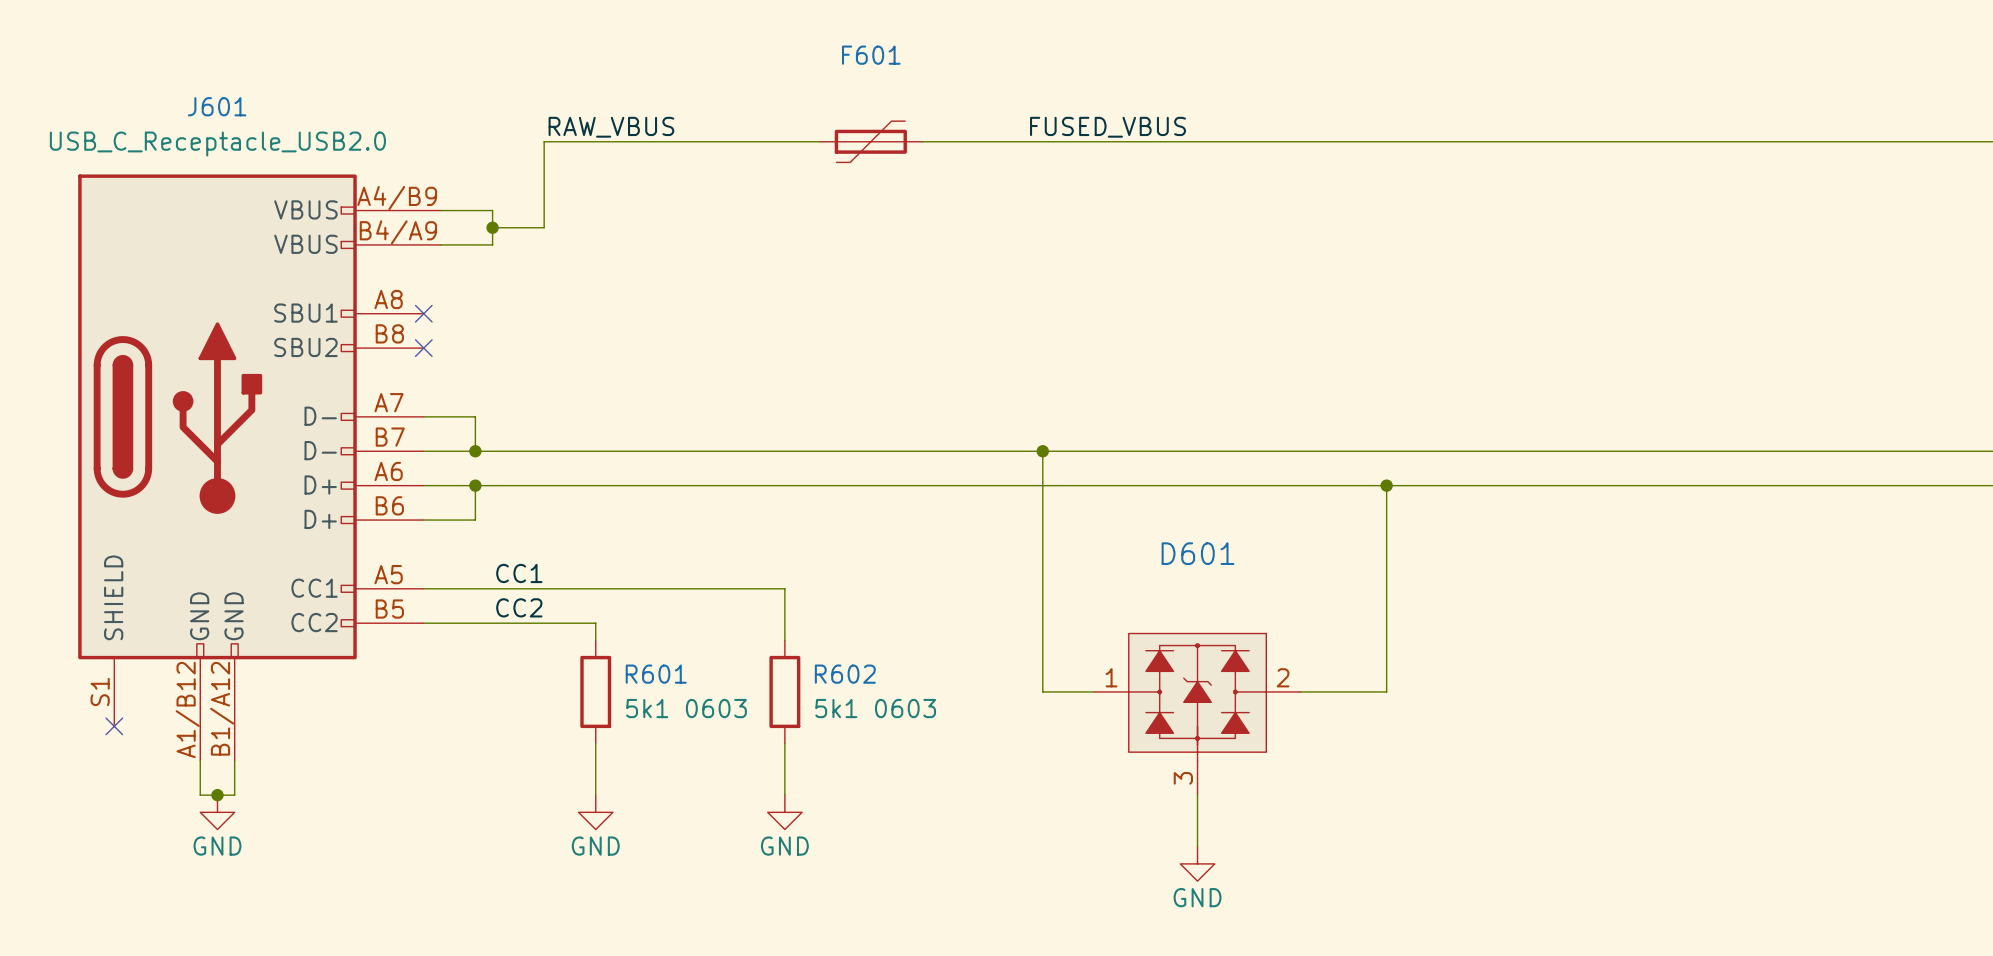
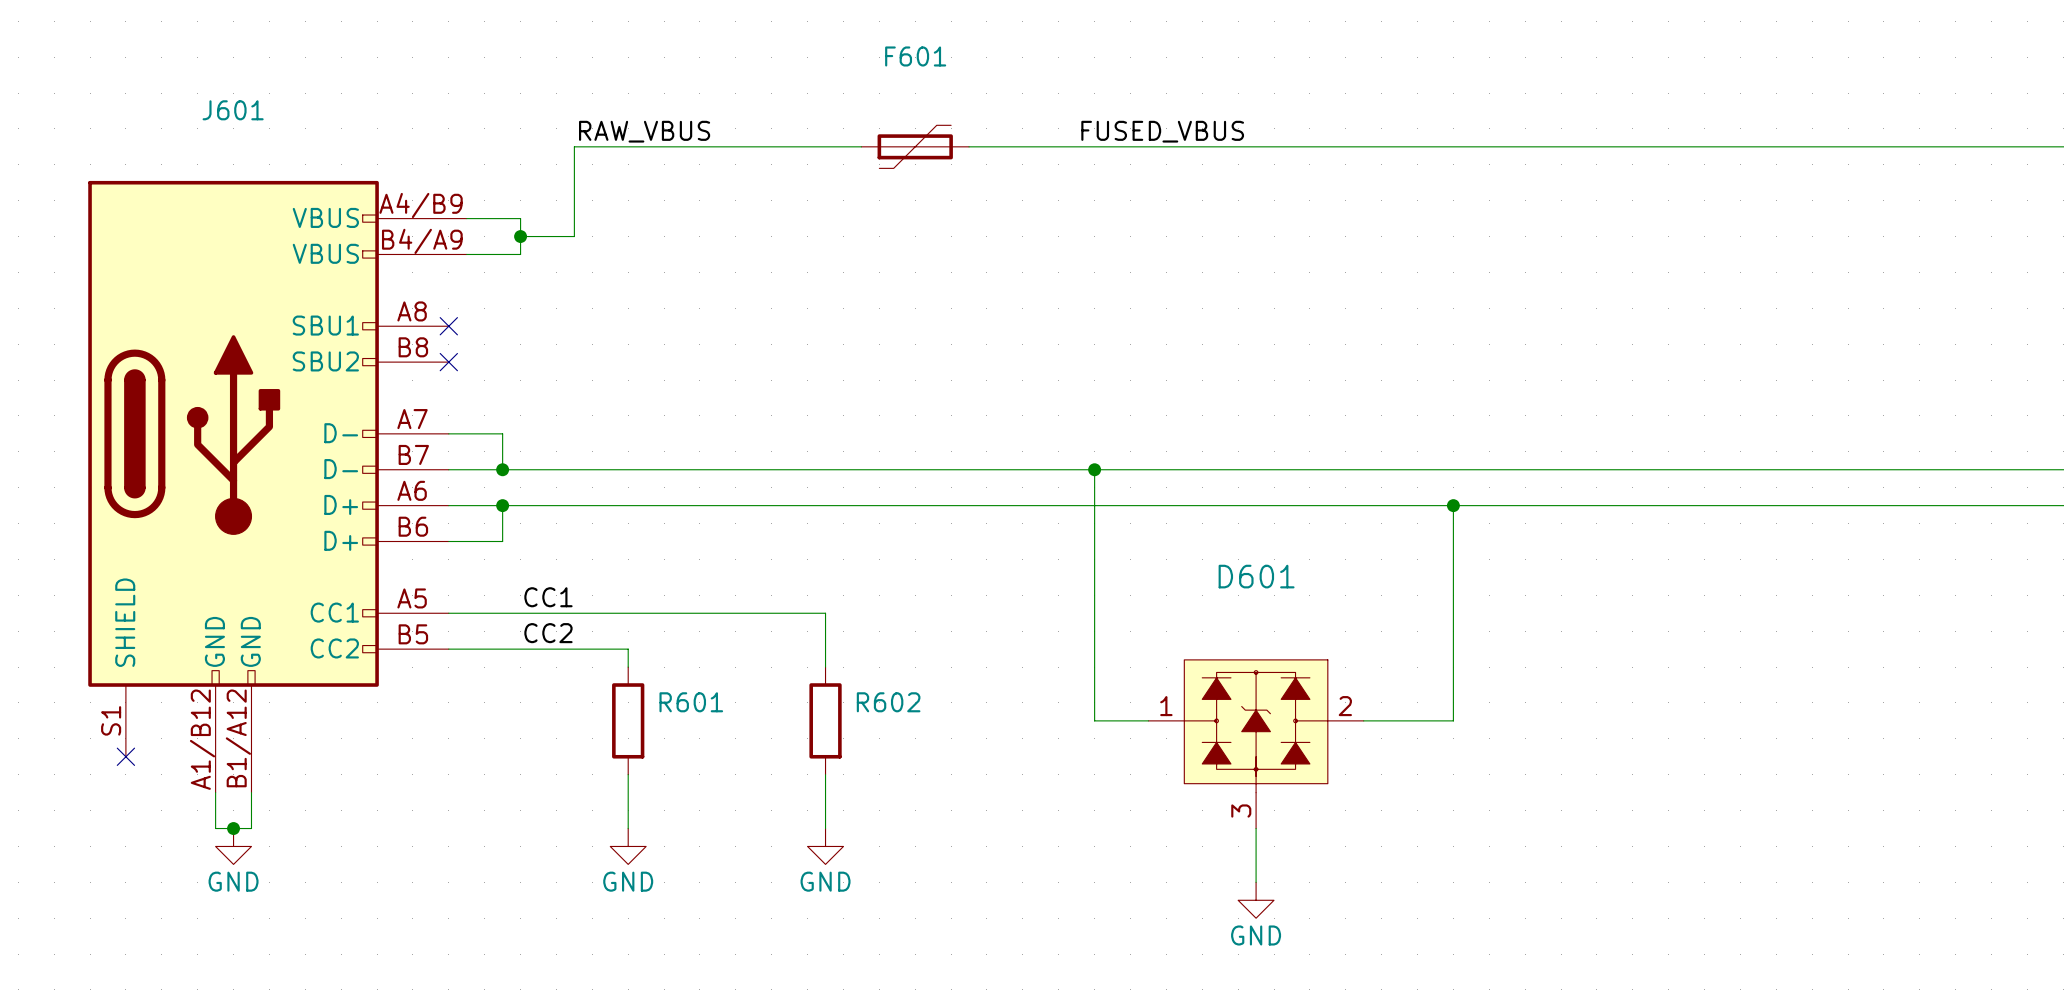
J601 value: USB_C_Receptacle_USB2.0 (217, 144) -> none
R601 value: 5k1 0603 (686, 708) -> none
R602 value: 5k1 0603 (875, 708) -> none

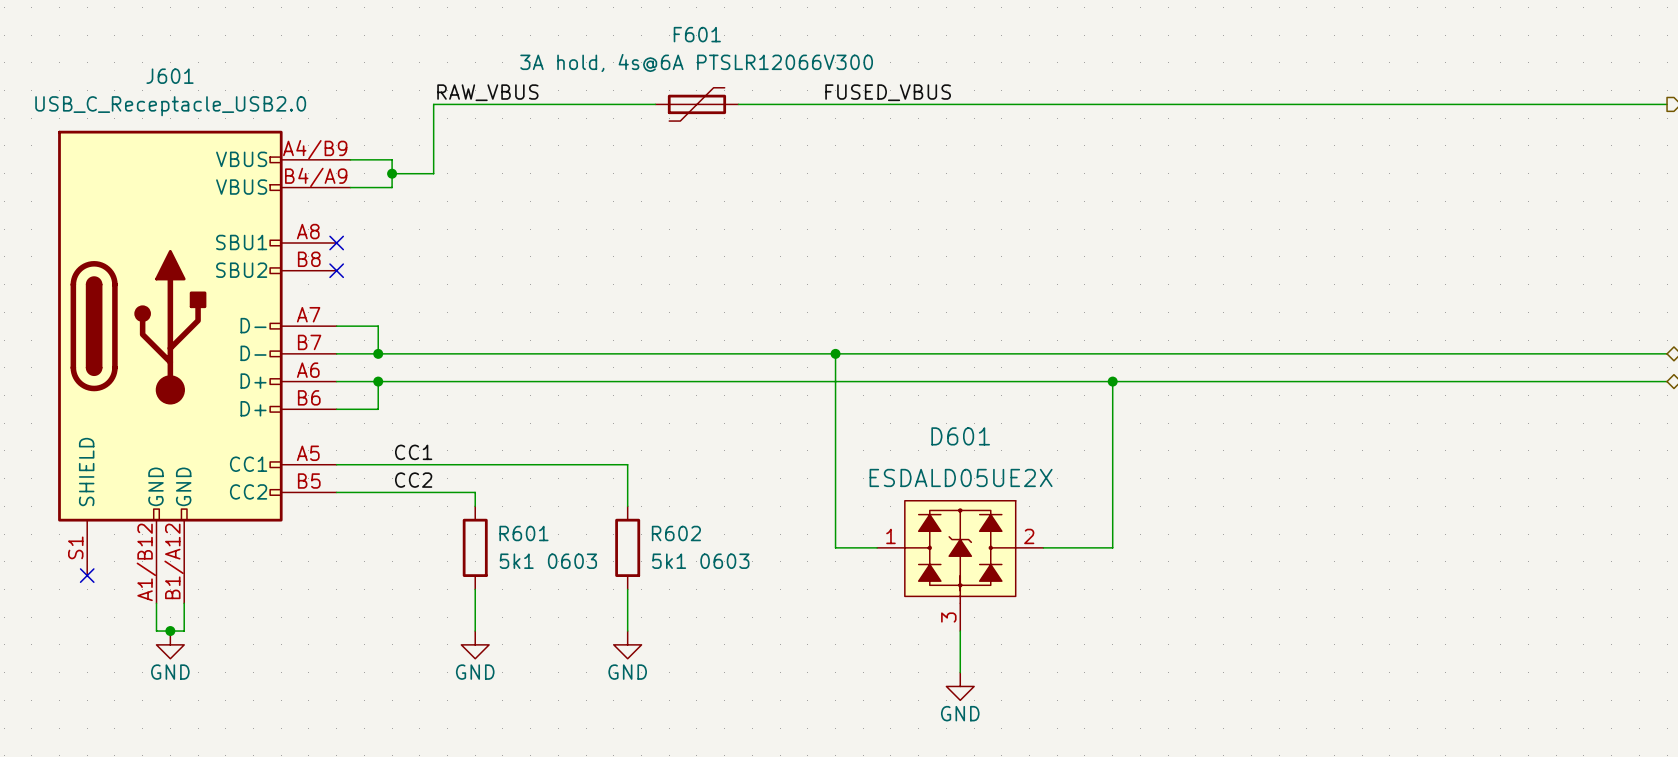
F601 value: none -> 3A hold, 4s@6A PTSLR12066V300 (696, 62)
J601 value: none -> USB_C_Receptacle_USB2.0 (170, 106)
D601 value: none -> ESDALD05UE2X (961, 477)
R601 value: none -> 5k1 0603 (548, 561)
R602 value: none -> 5k1 0603 (700, 561)

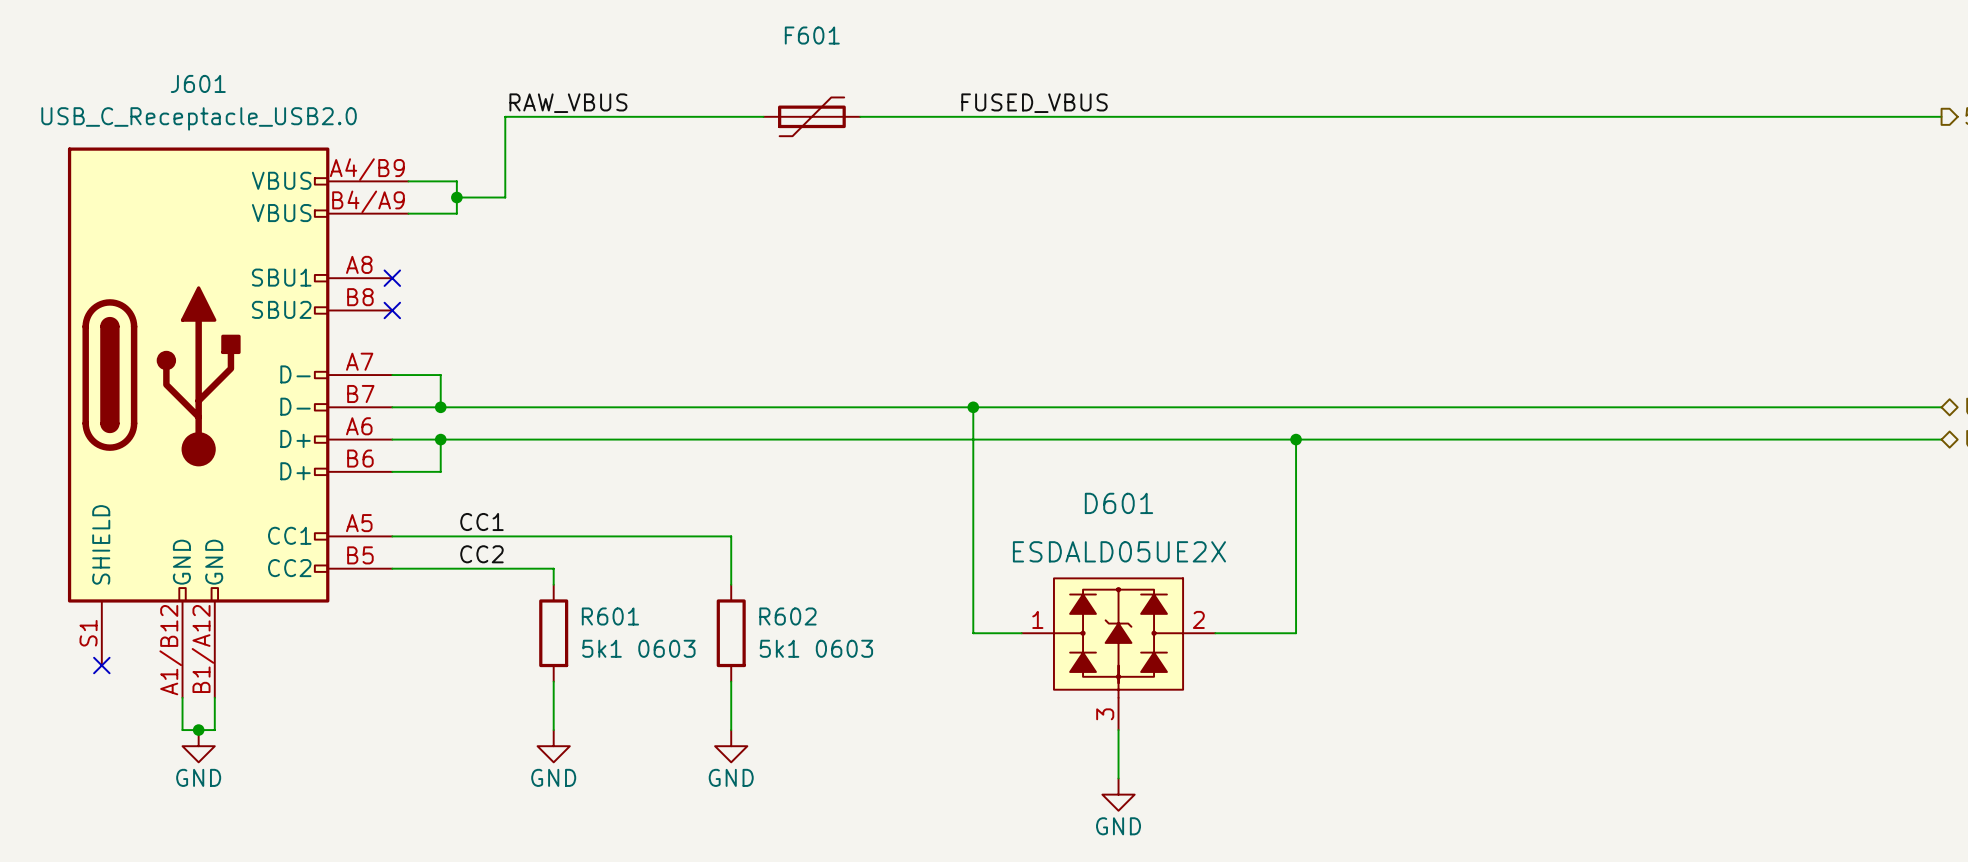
F601 value: 3A hold, 4s@6A PTSLR12066V300 (696, 62) -> none

